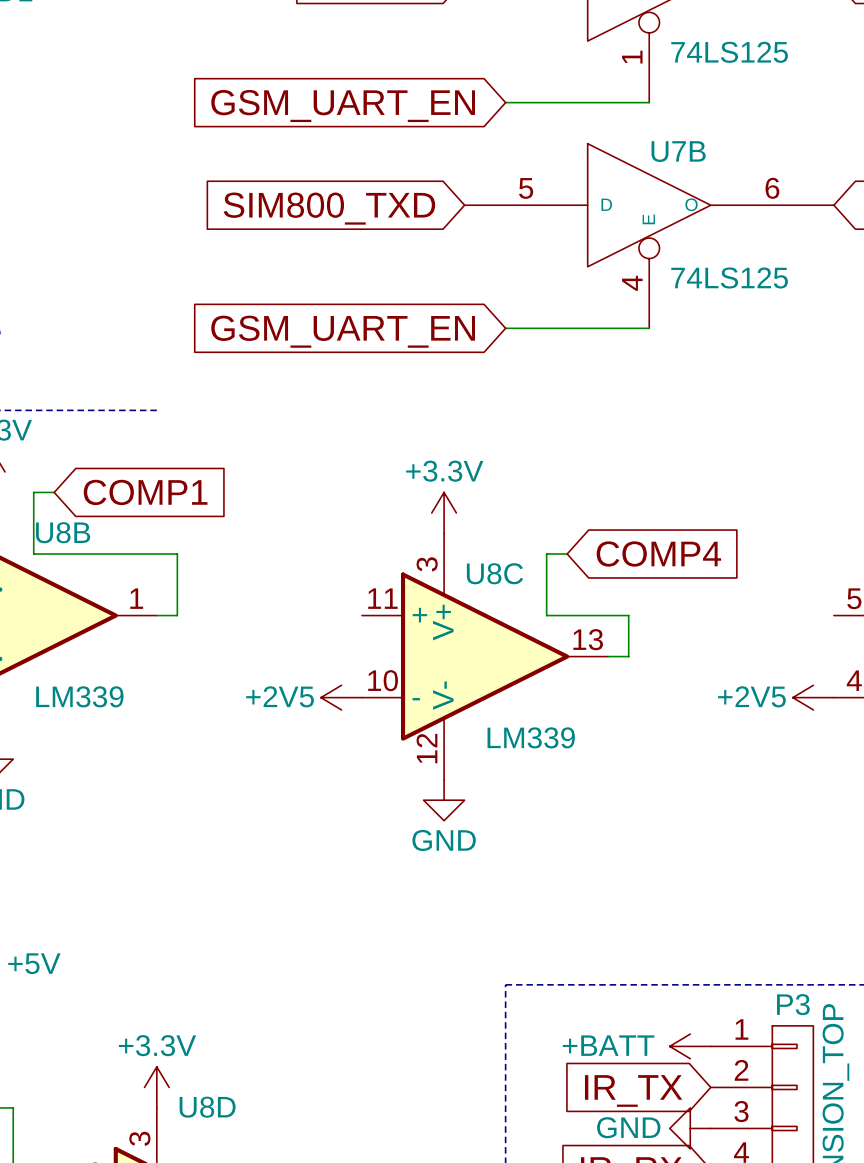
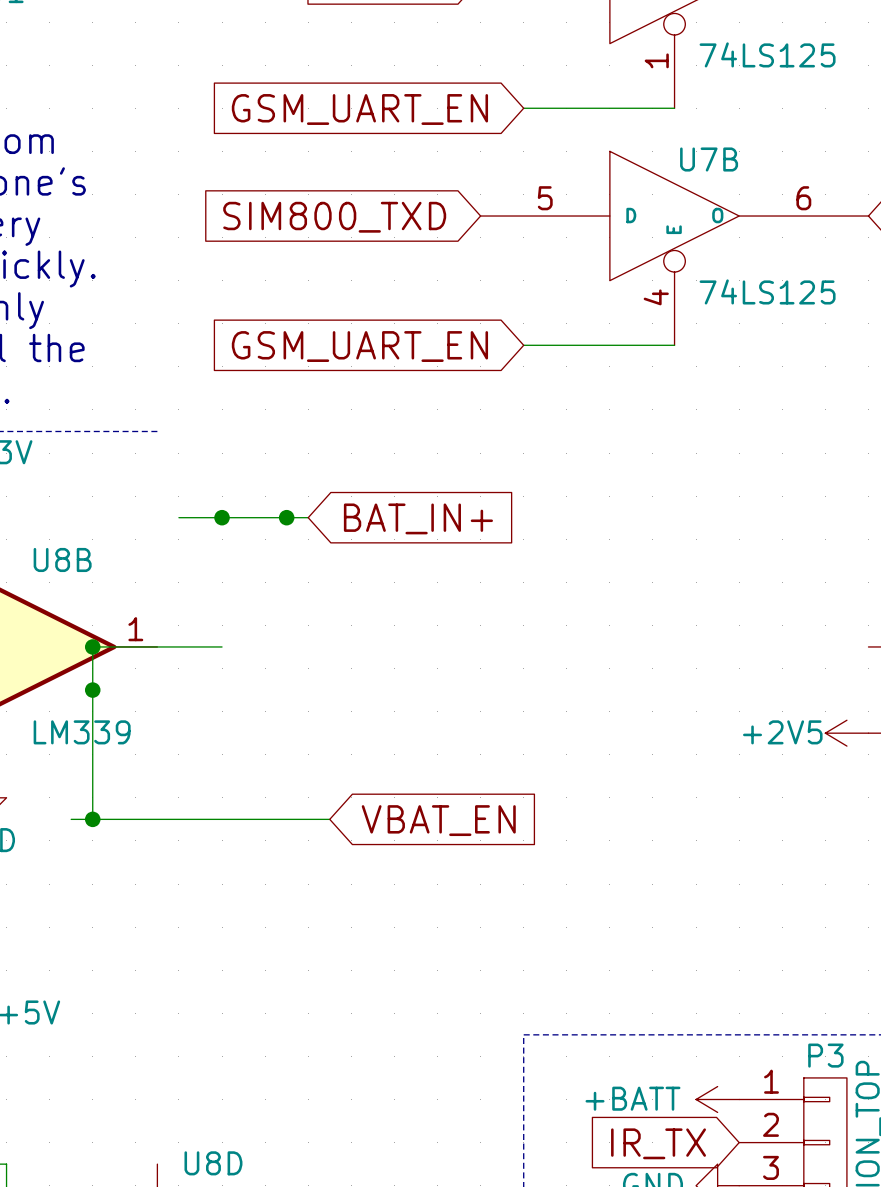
wire: (54, 492) (33, 492) (33, 554) (177, 554) (177, 615) -> (222, 646) (178, 646)
global label: COMP1 (145, 492) -> none
wire: none -> (178, 517) (308, 517)
junction: none -> (222, 517)
junction: none -> (286, 517)
global label: none -> BAT_IN+ (418, 518)
power symbol: +3.3V (444, 512) -> none
wire: (567, 554) (546, 554) (546, 615) (628, 615) (628, 656) (608, 656) -> none
global label: COMP4 (658, 554) -> none
junction: none -> (92, 646)
wire: none -> (157, 646) (92, 646) (92, 819)
junction: none -> (92, 690)
U8C: LM339 (485, 656) -> none
power symbol: +2V5 (341, 697) -> none
wire: none -> (71, 819) (329, 819)
junction: none -> (92, 819)
global label: none -> VBAT_EN (438, 820)
power symbol: GND (444, 800) -> none
power symbol: +3.3V (156, 1087) -> none

